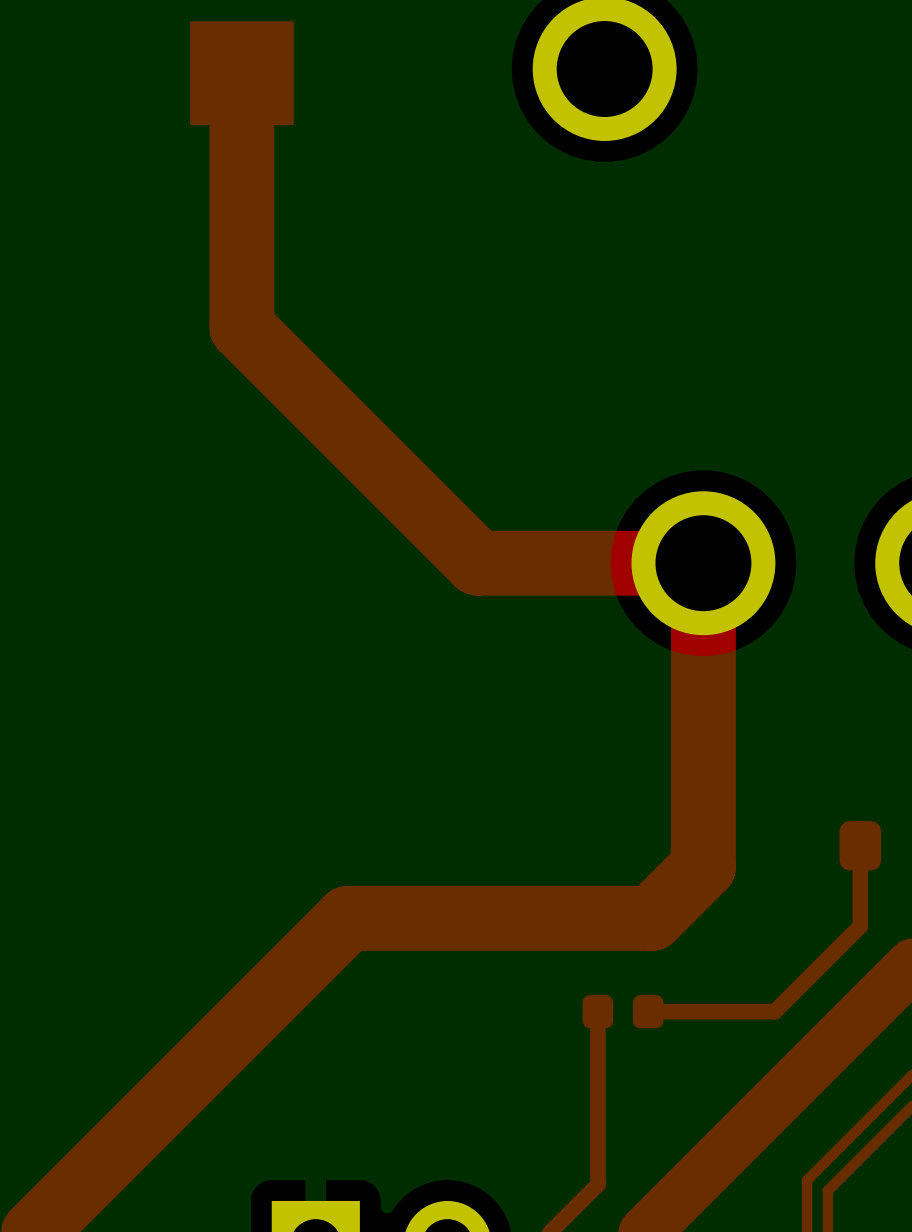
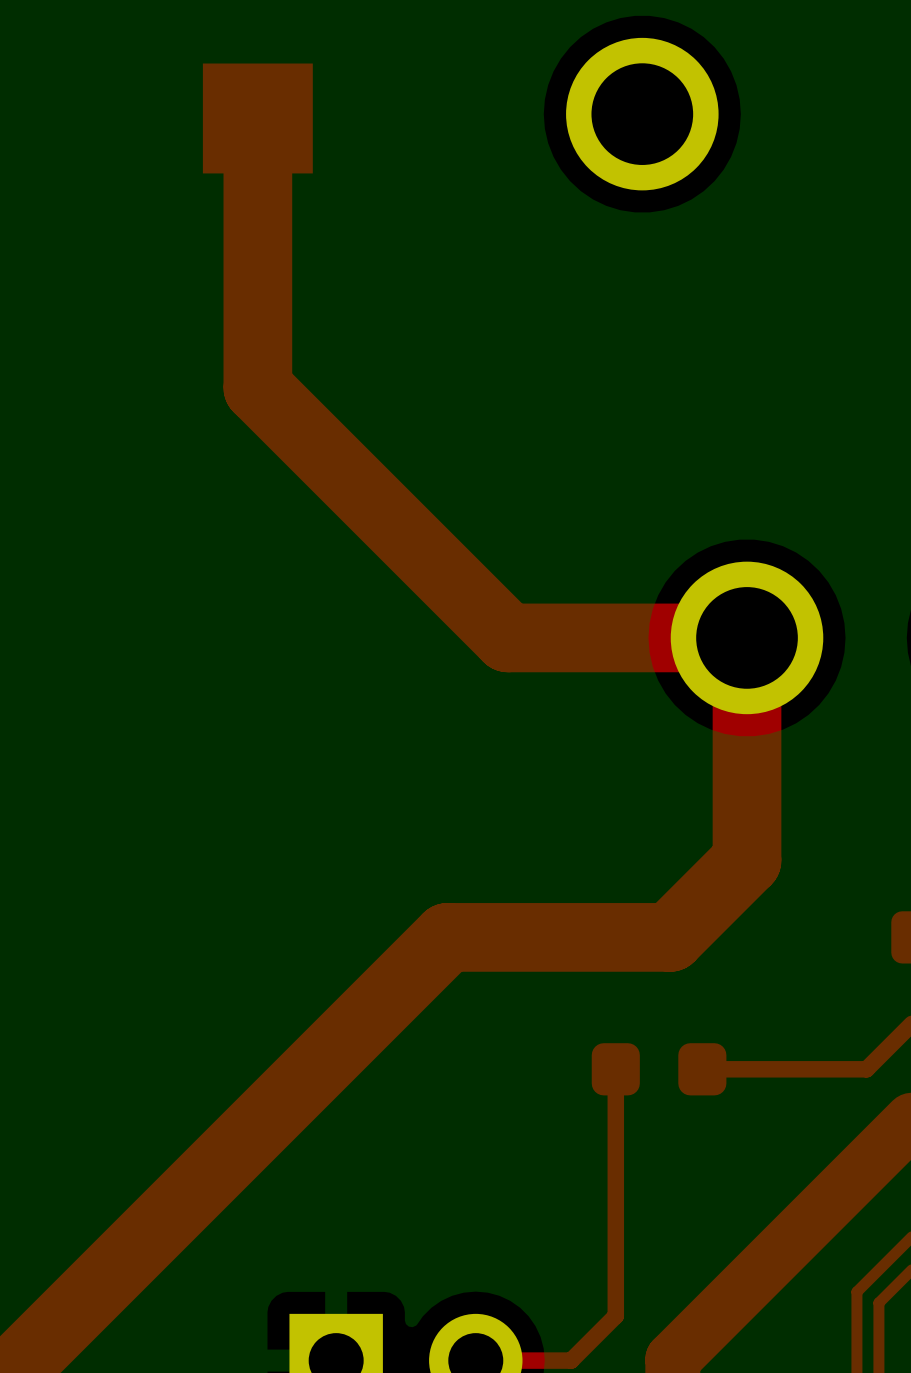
top track: (703, 773) (703, 866) (651, 918) (348, 918) -> (747, 860) (670, 937) (447, 937) (370, 1014)
top track: (816, 970) (774, 1011) (648, 1011) -> (866, 1069) (702, 1069)
part footprint: [582, 995, 664, 1029] -> [591, 1043, 727, 1096]
top track: (597, 1011) (597, 1184) (579, 1202) -> (615, 1069) (615, 1315)

